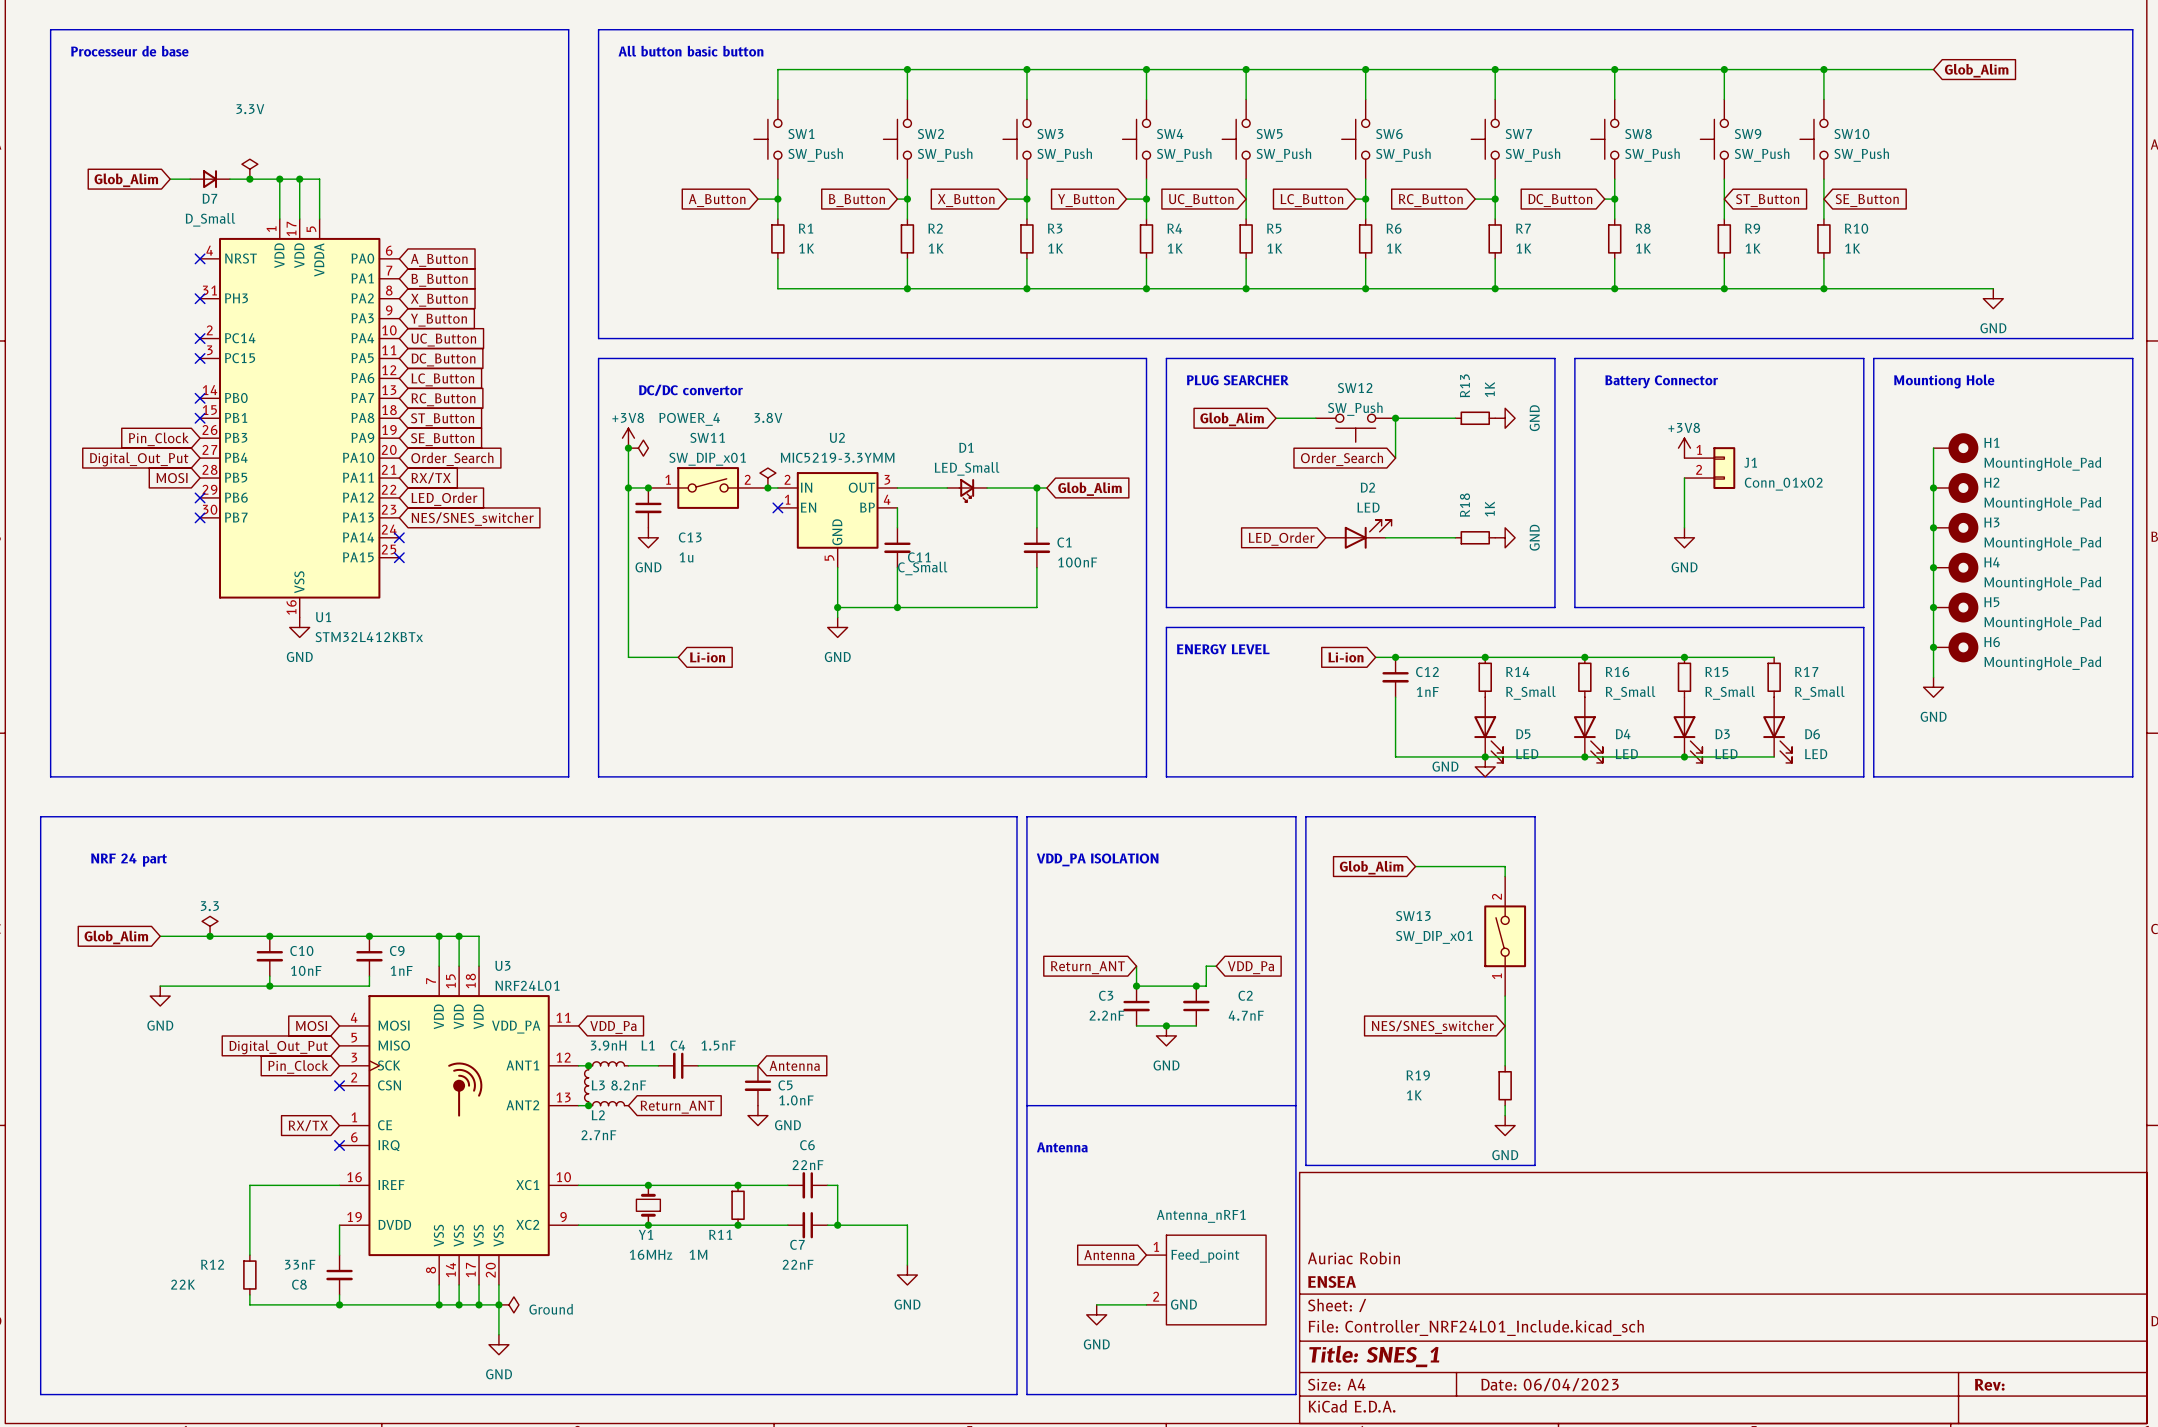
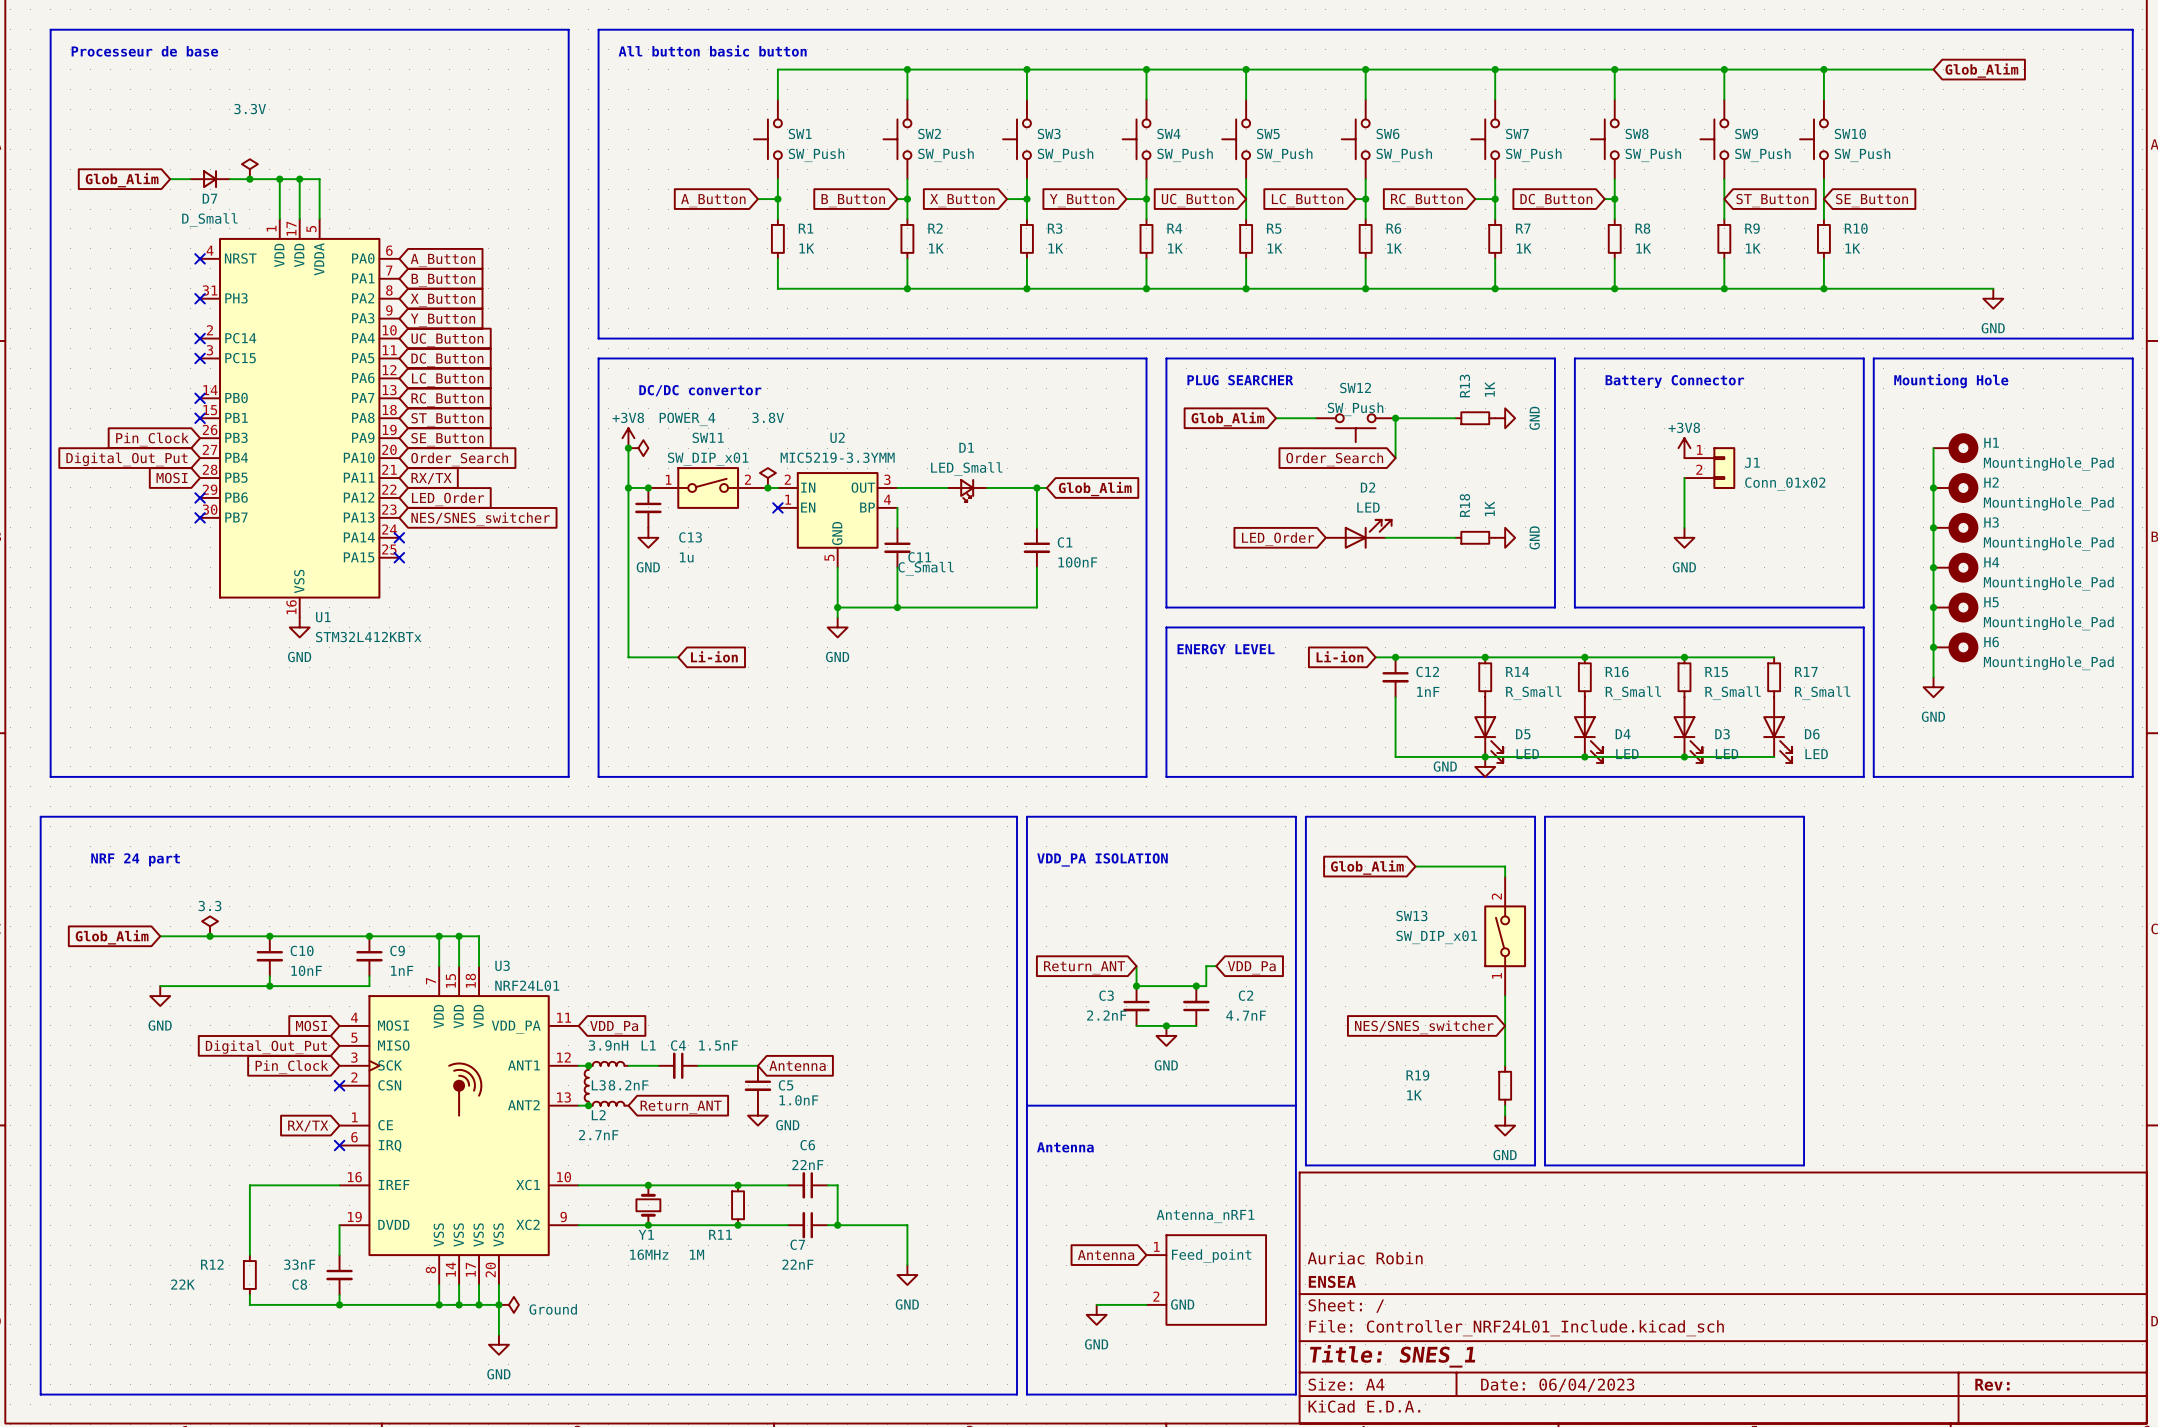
line: none -> (1545, 816) (1545, 1165) (1804, 1165) (1804, 816) (1545, 816)

